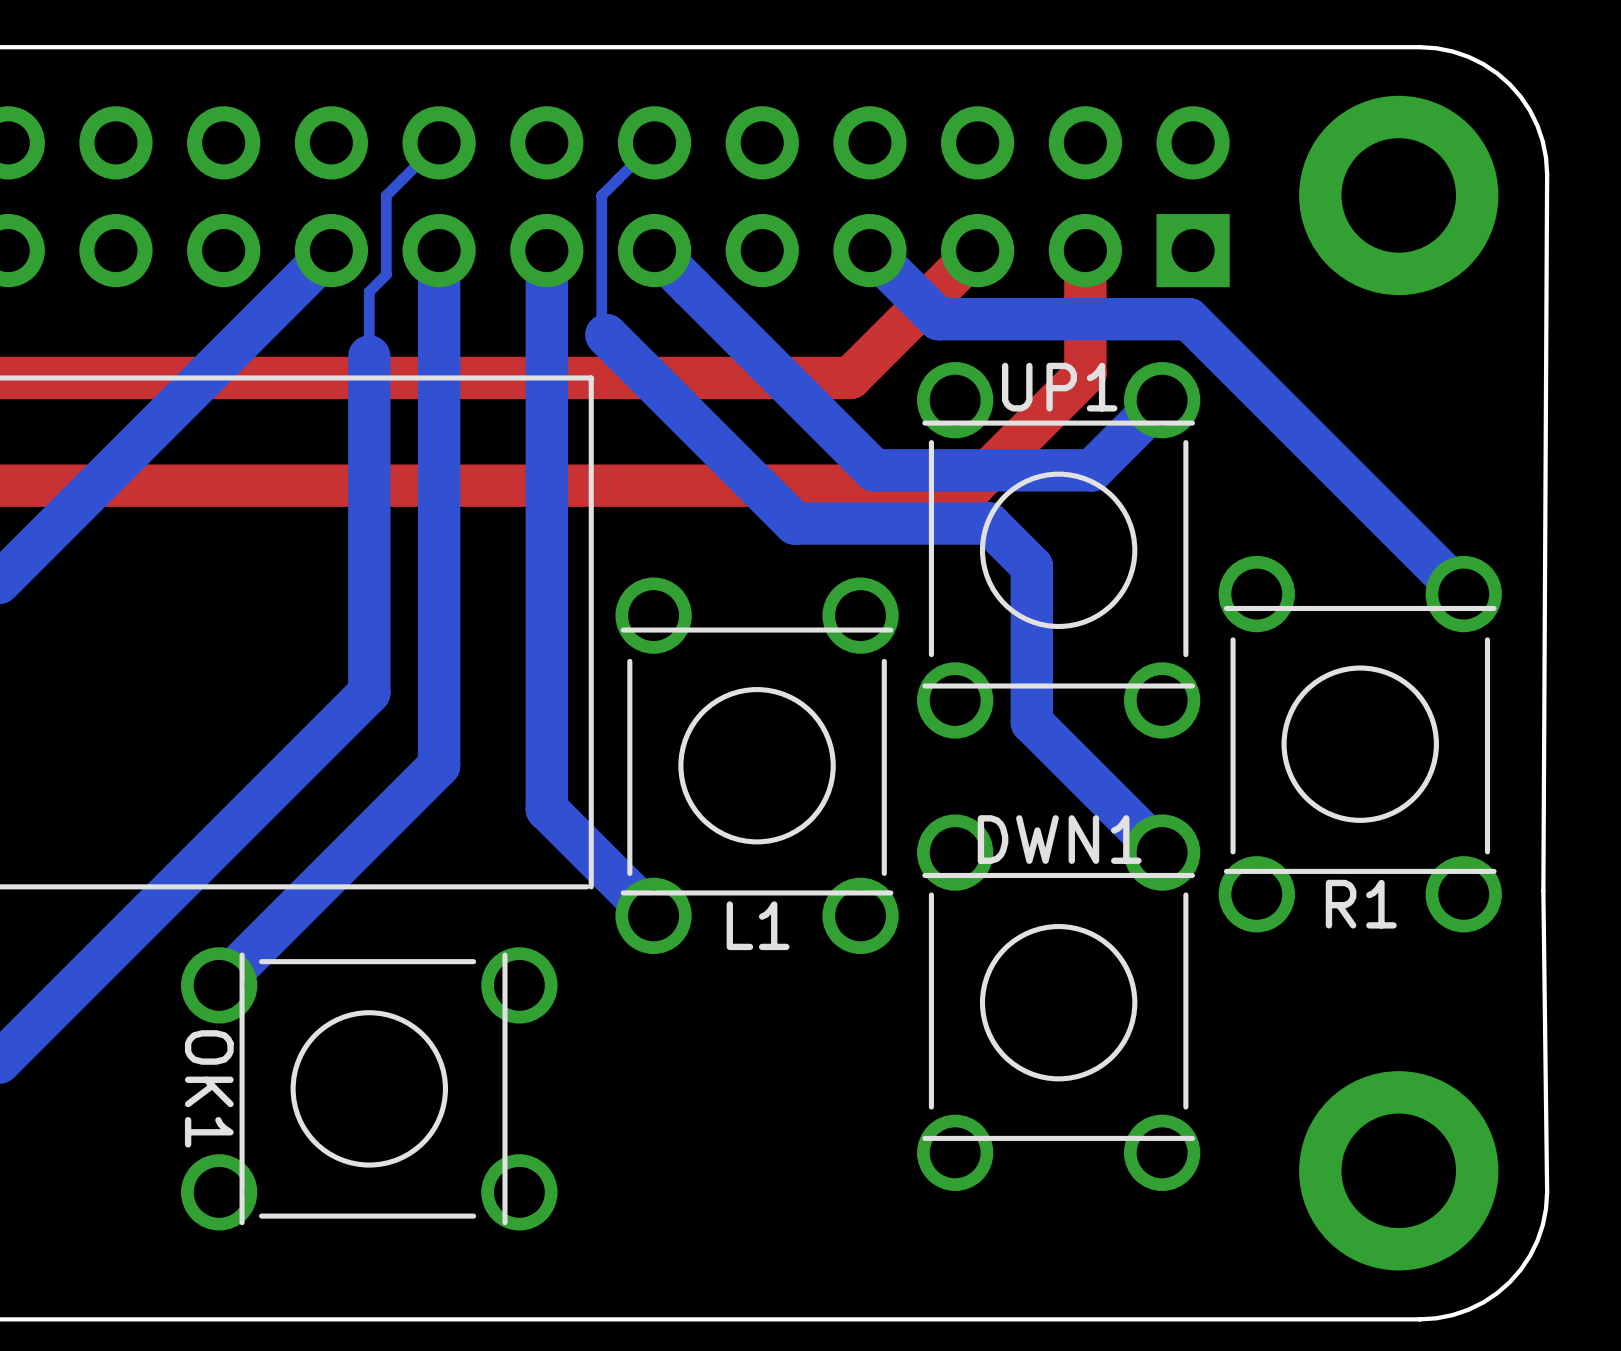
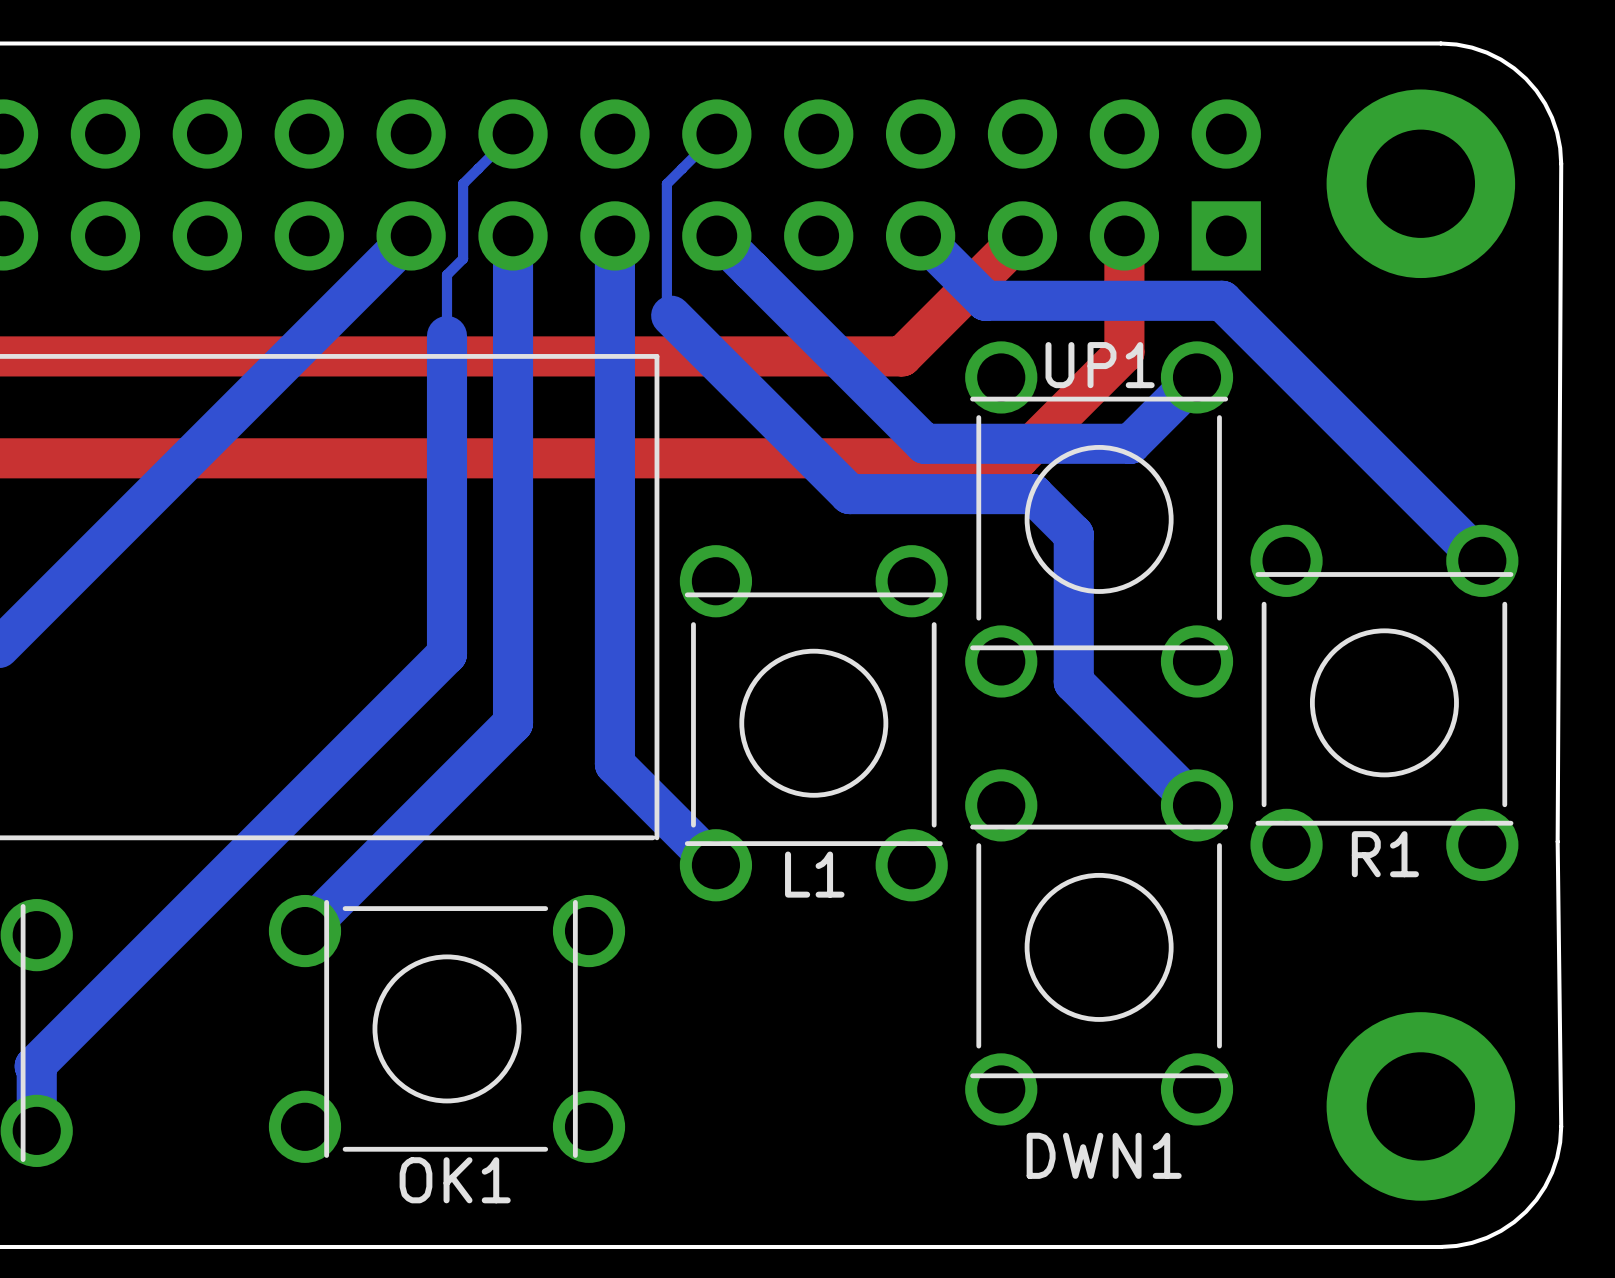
DWN1 name position: DWN1 (1059, 839) -> DWN1 (1104, 1155)
OK1 name rotation: 0° (209, 1088) -> 90° counterclockwise (455, 1180)
OK1 name position: OK1 (209, 1088) -> OK1 (455, 1180)

